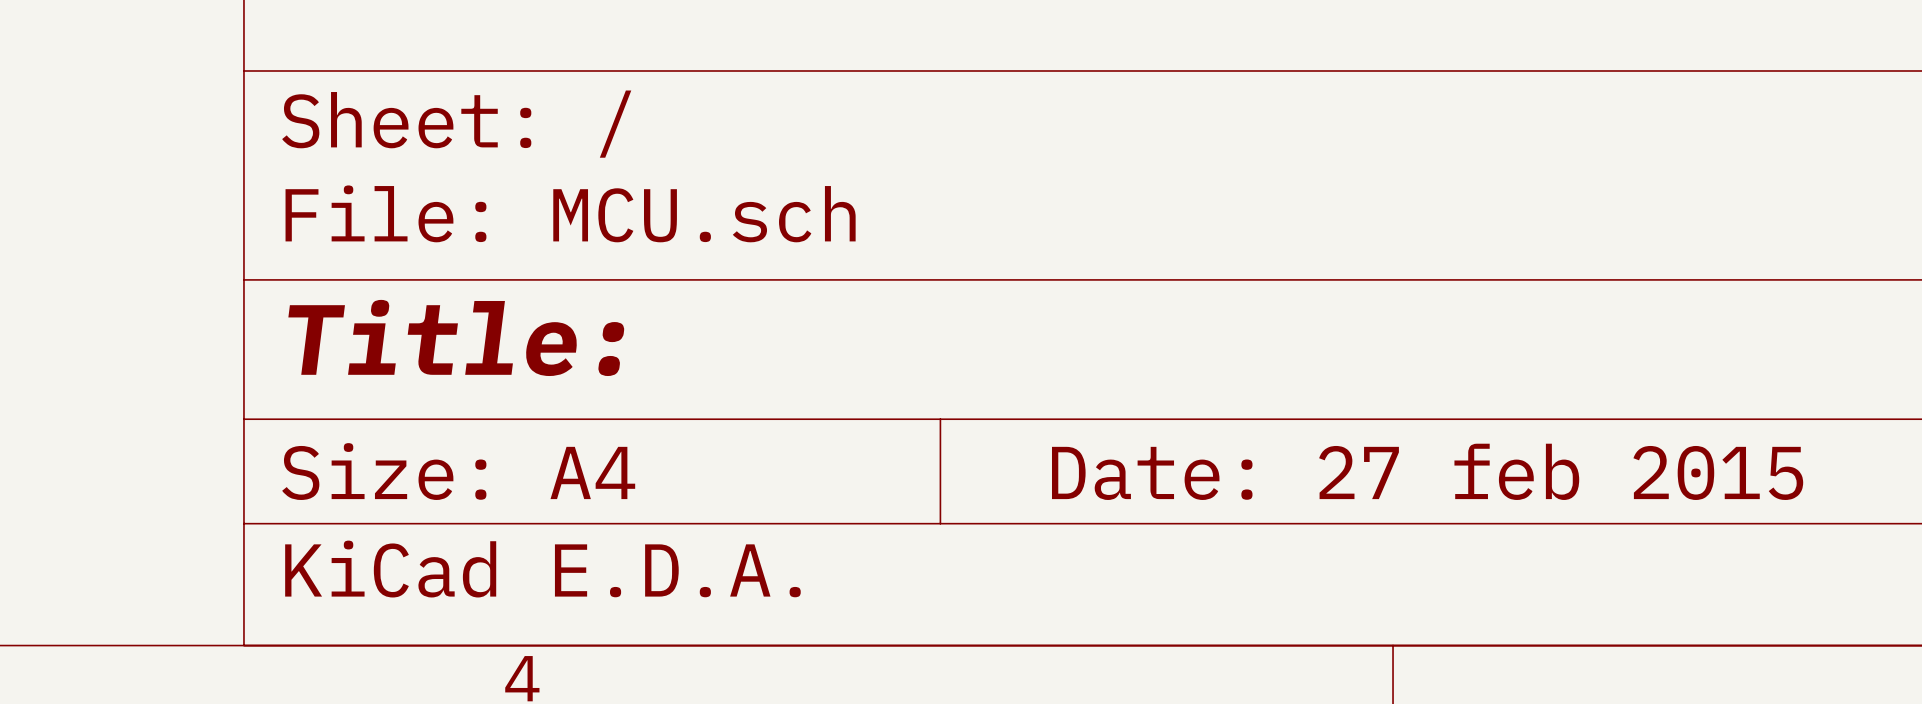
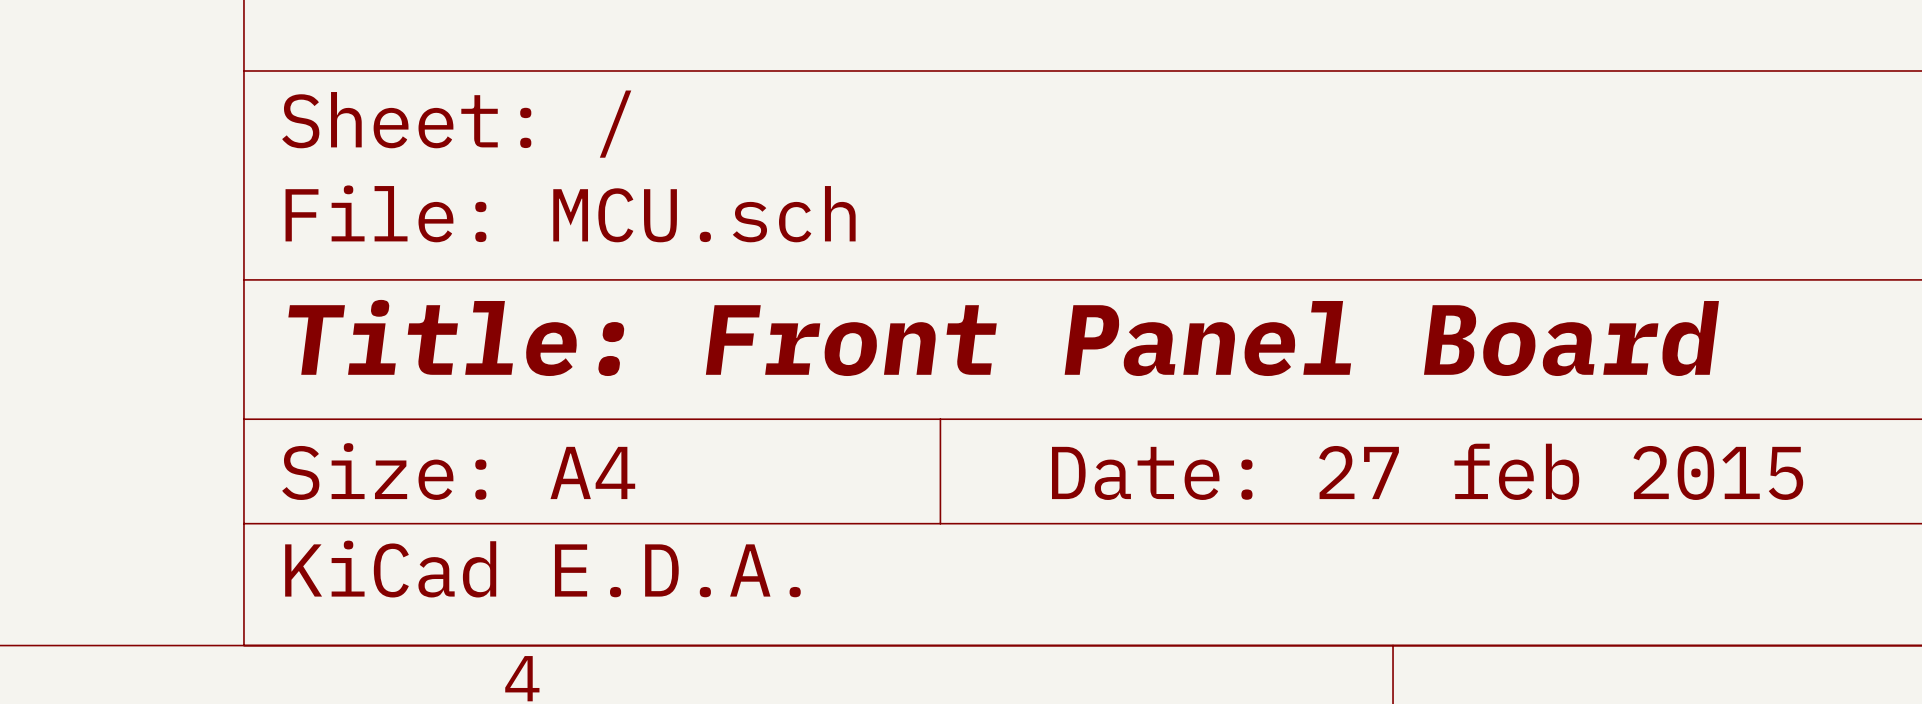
title block: Title: (456, 337) -> Title: Front Panel Board (1003, 337)

